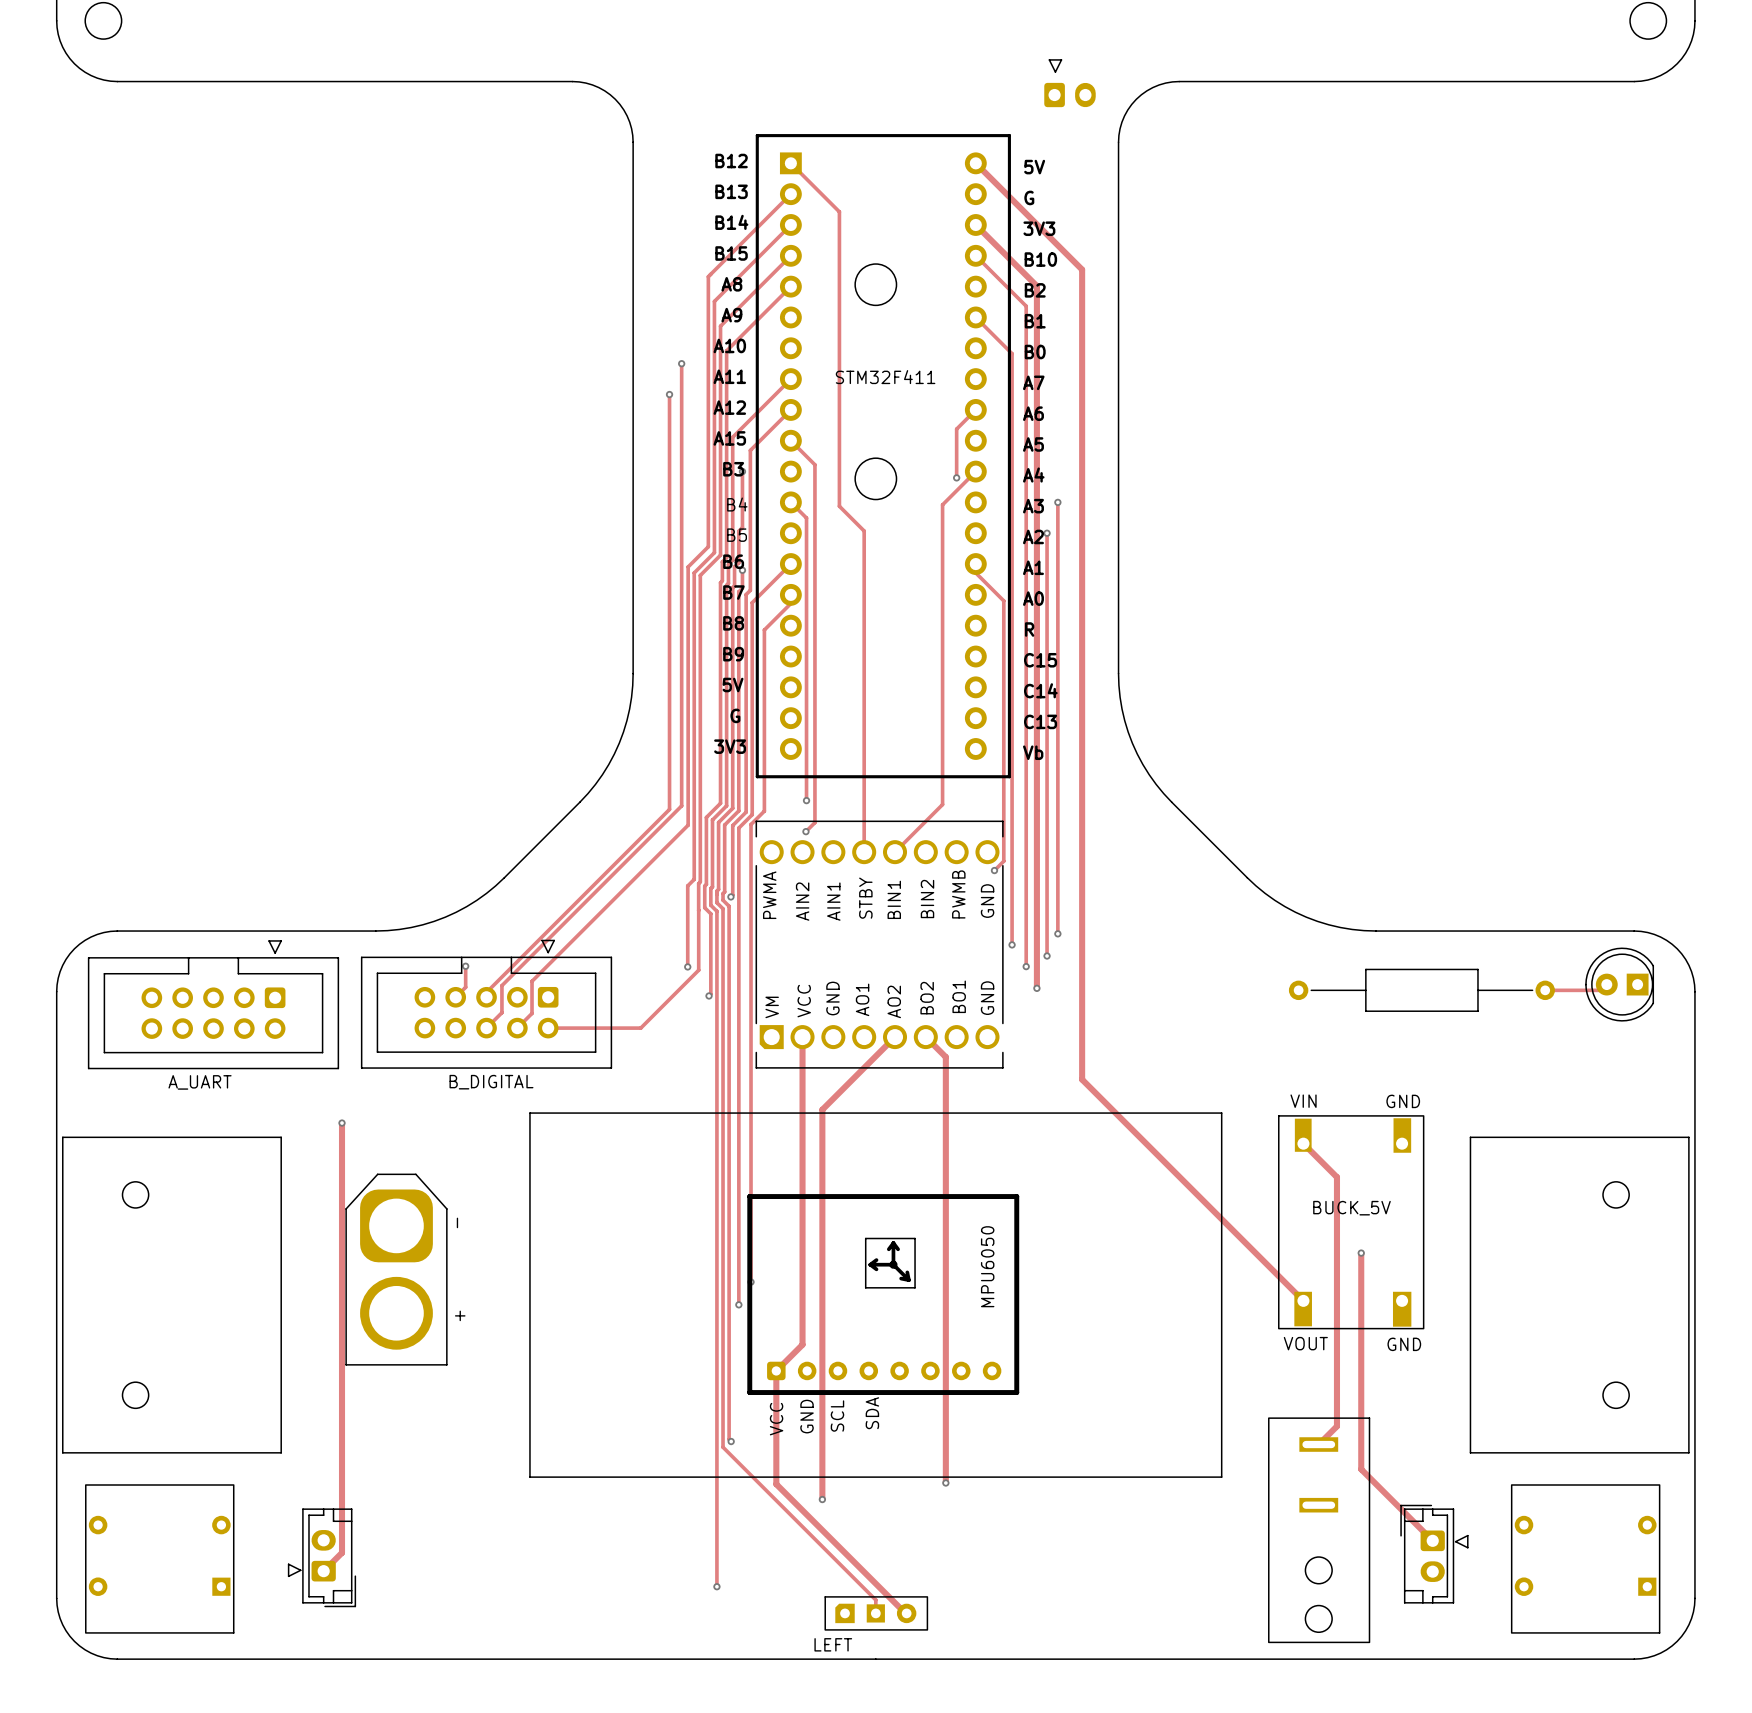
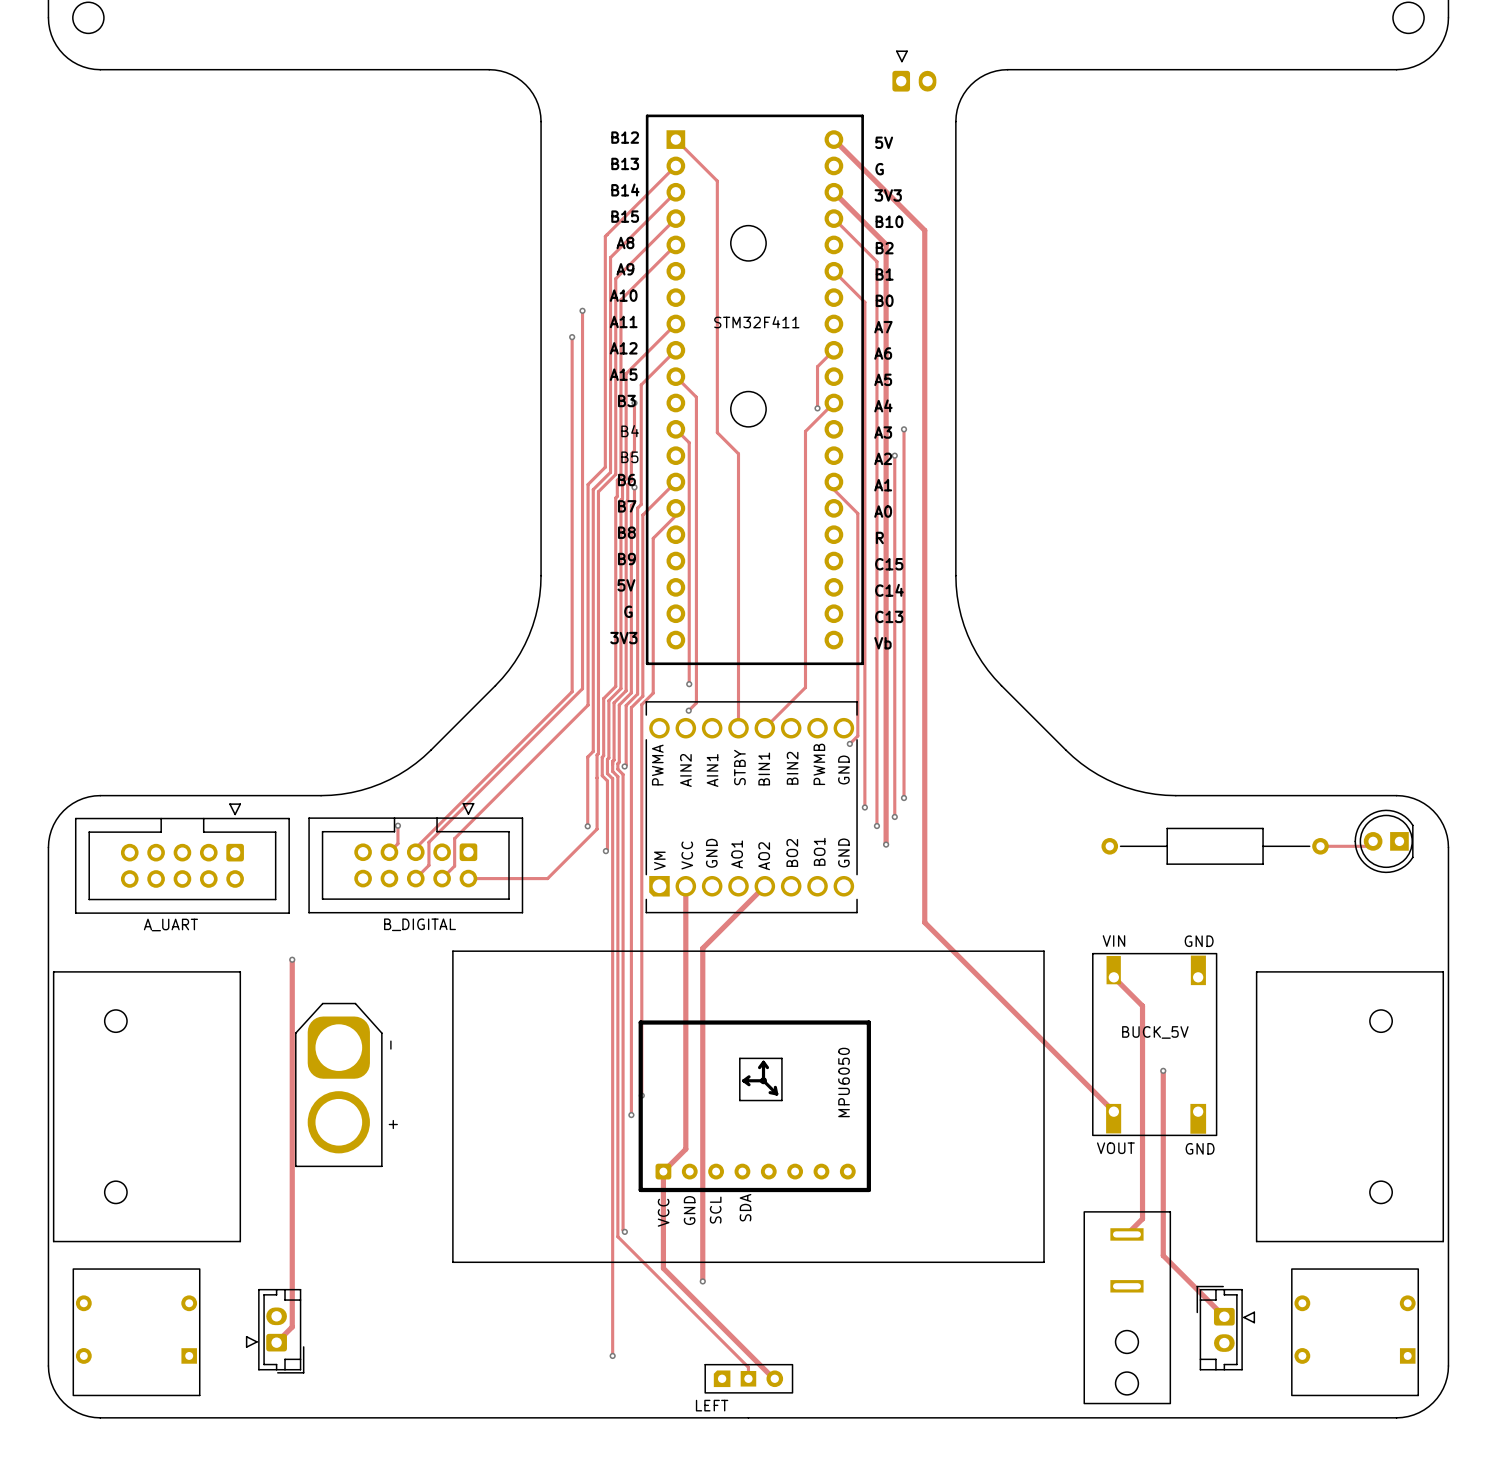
track: (925, 1037) (945, 1057) (945, 1483) -> none
via: (945, 1483) -> none

